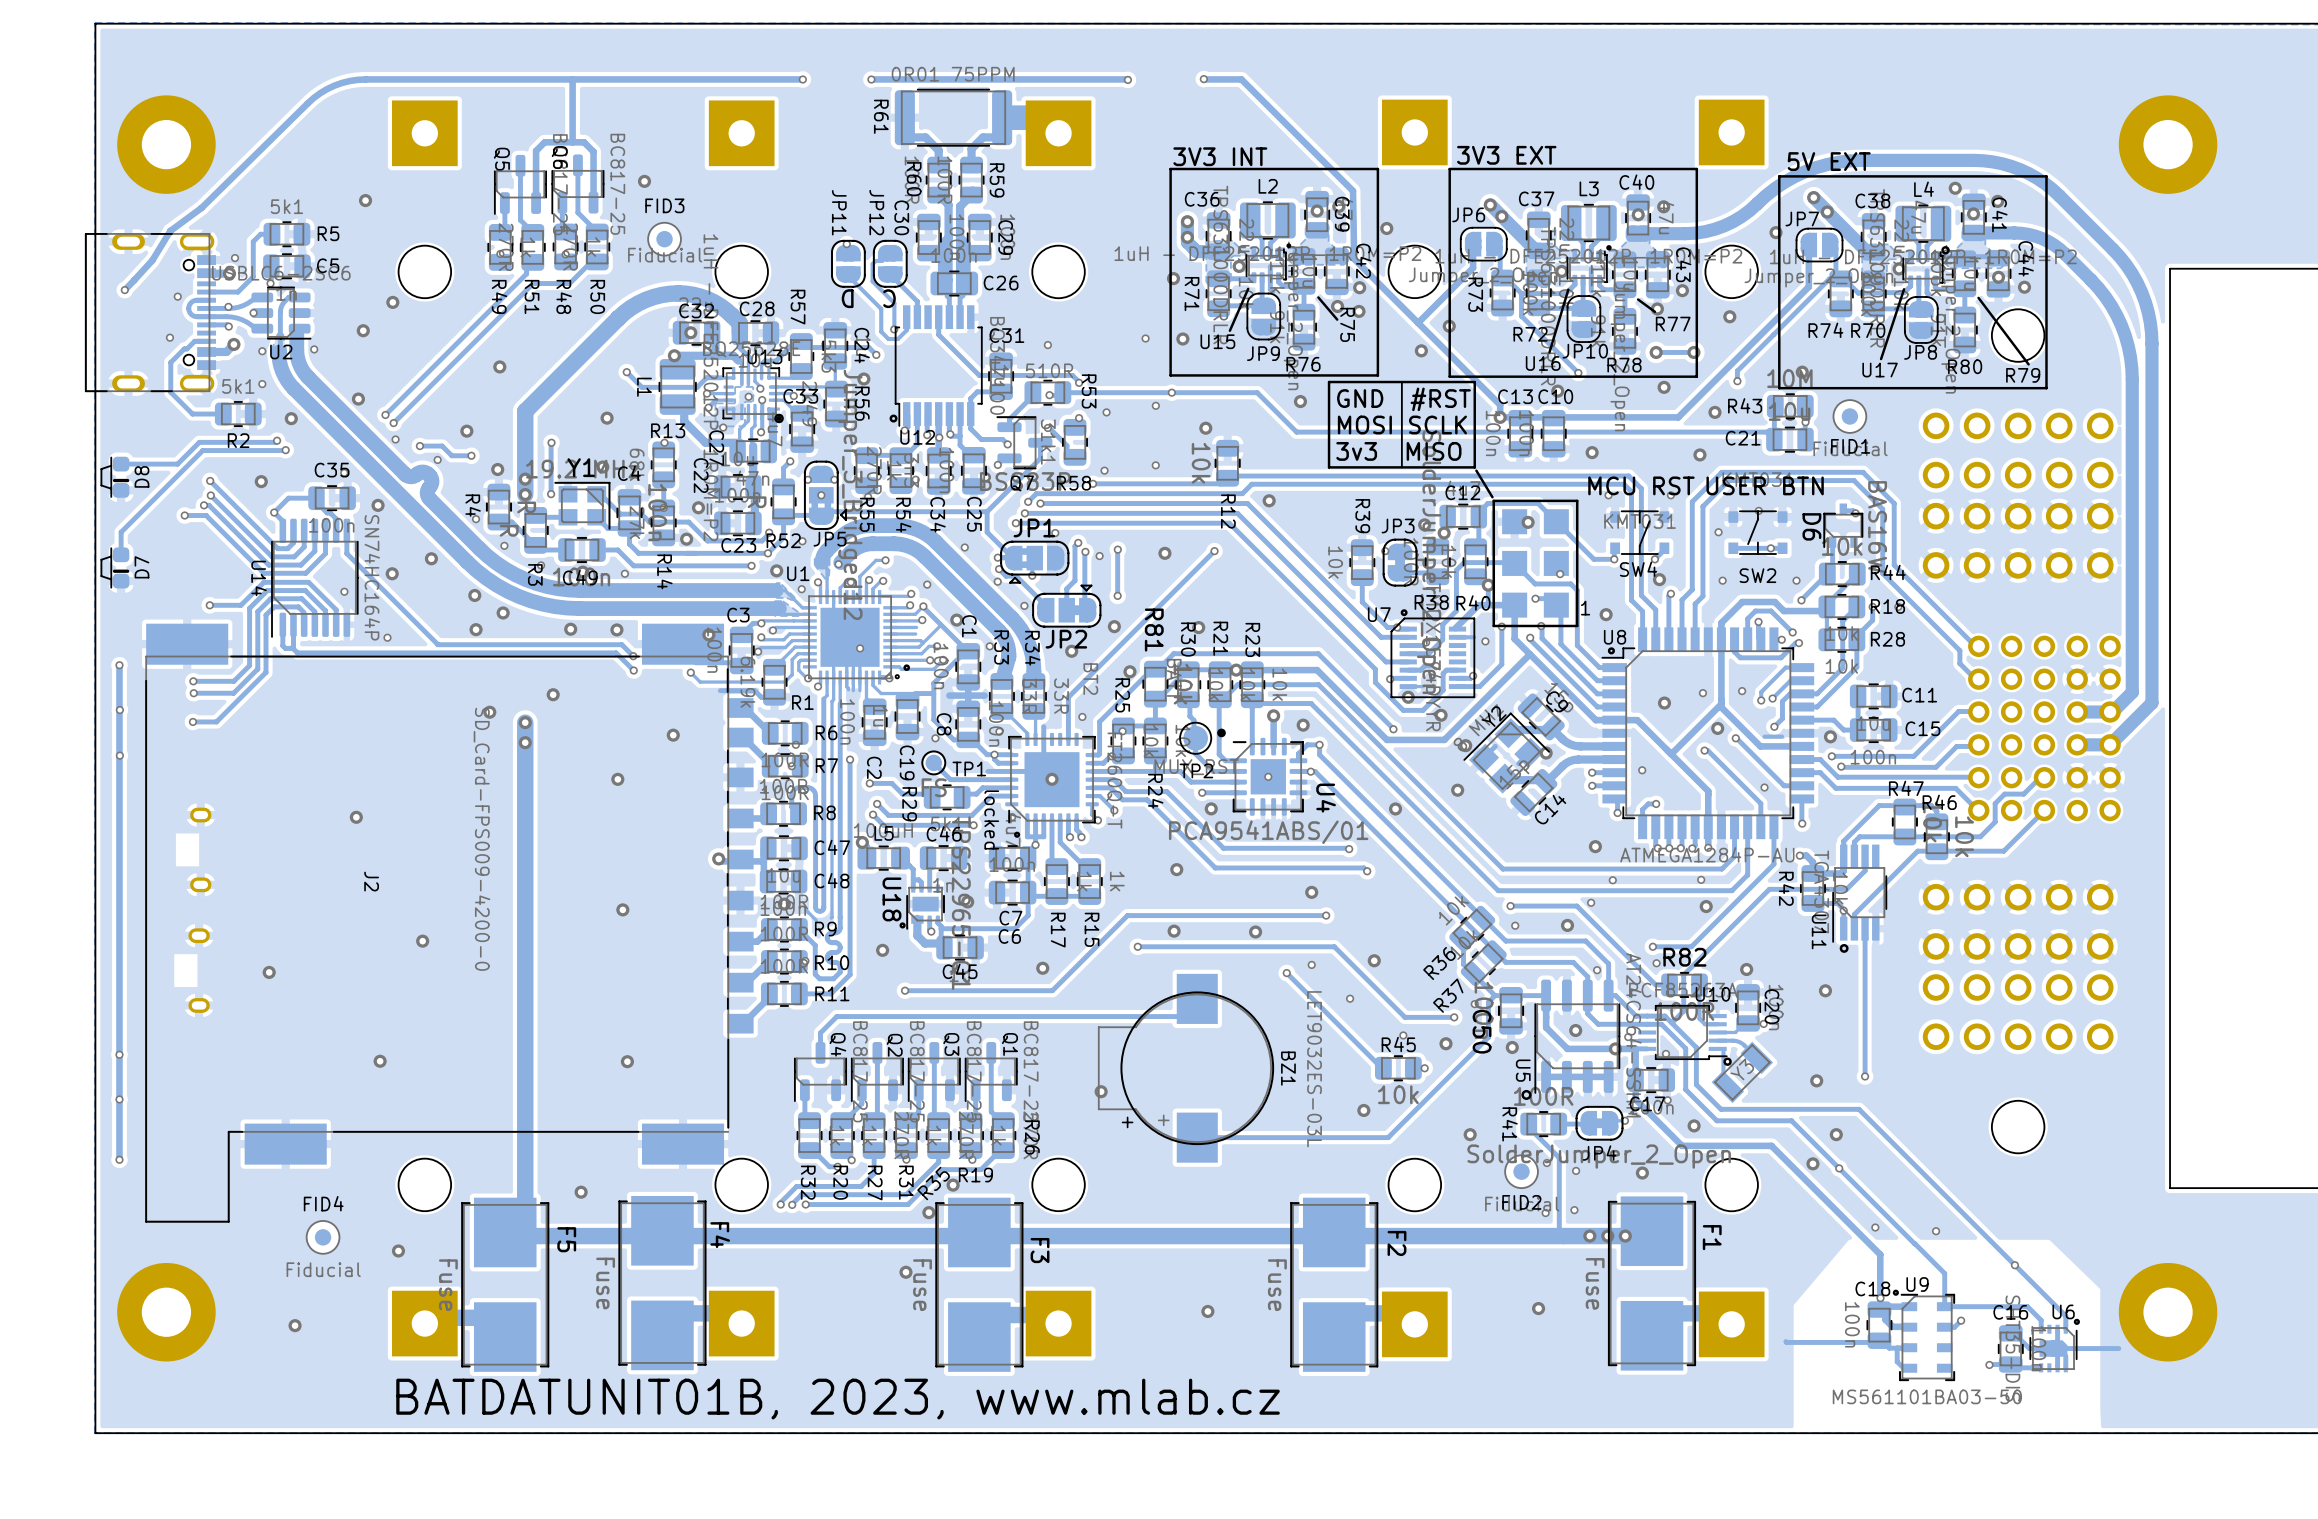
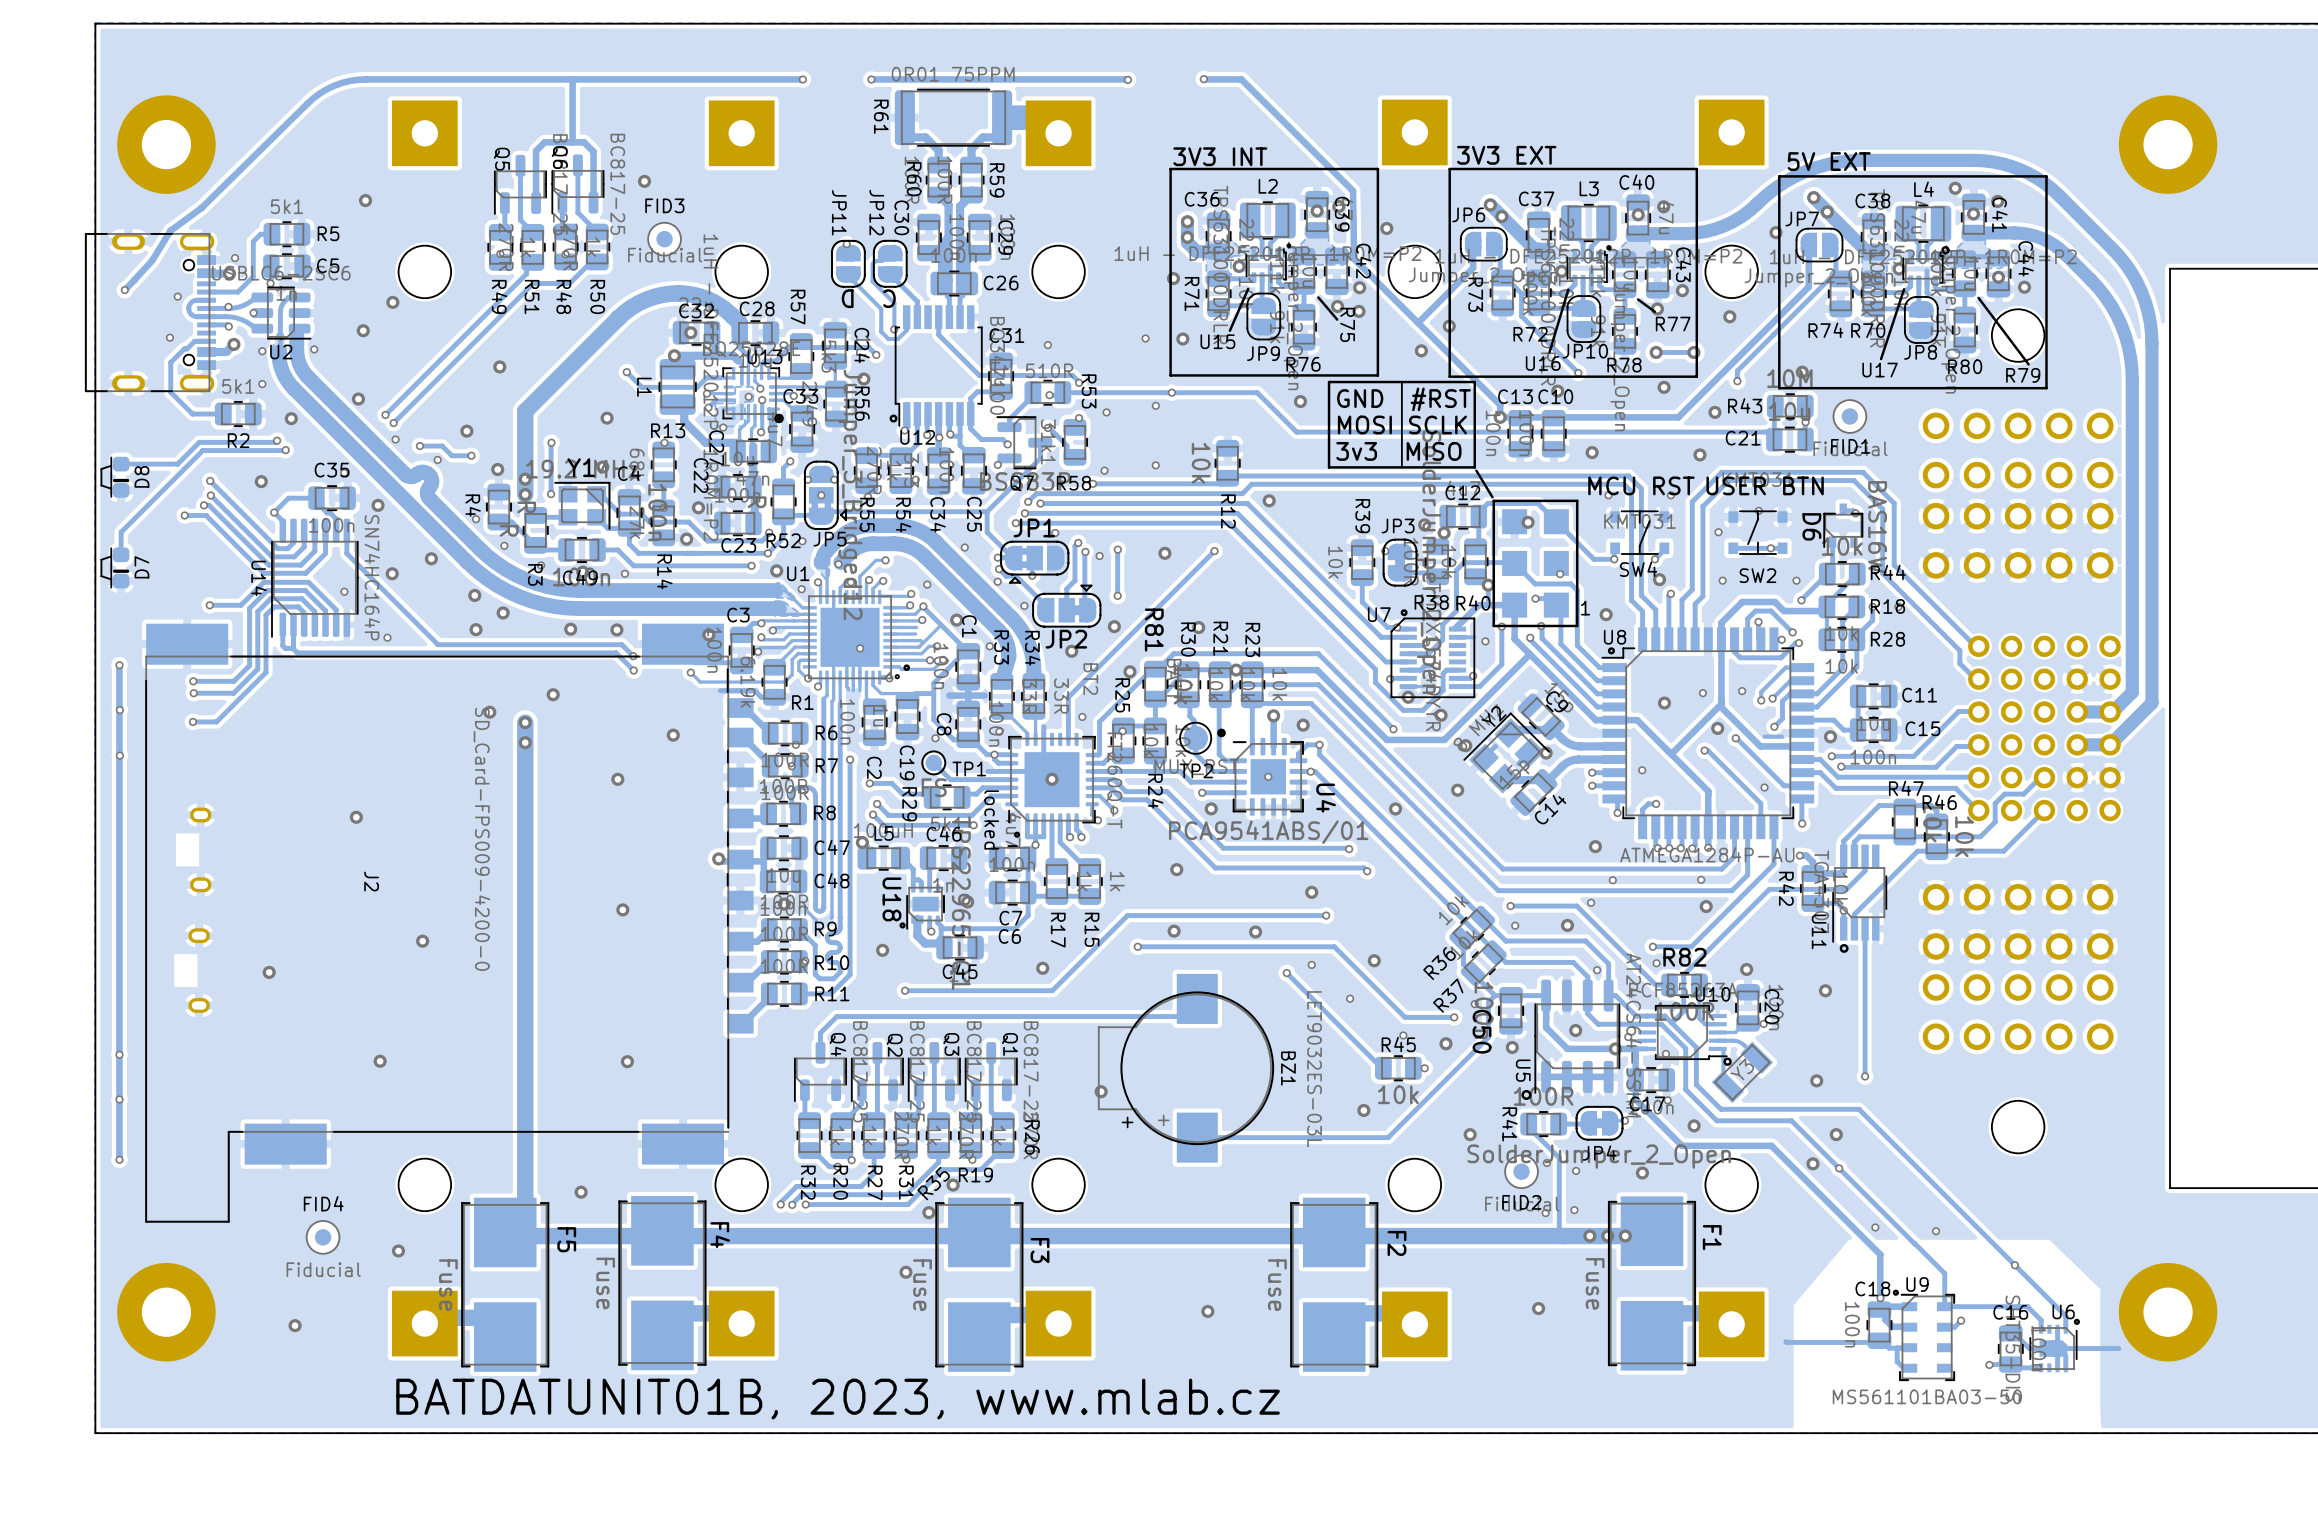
via: (1205, 428) -> none

